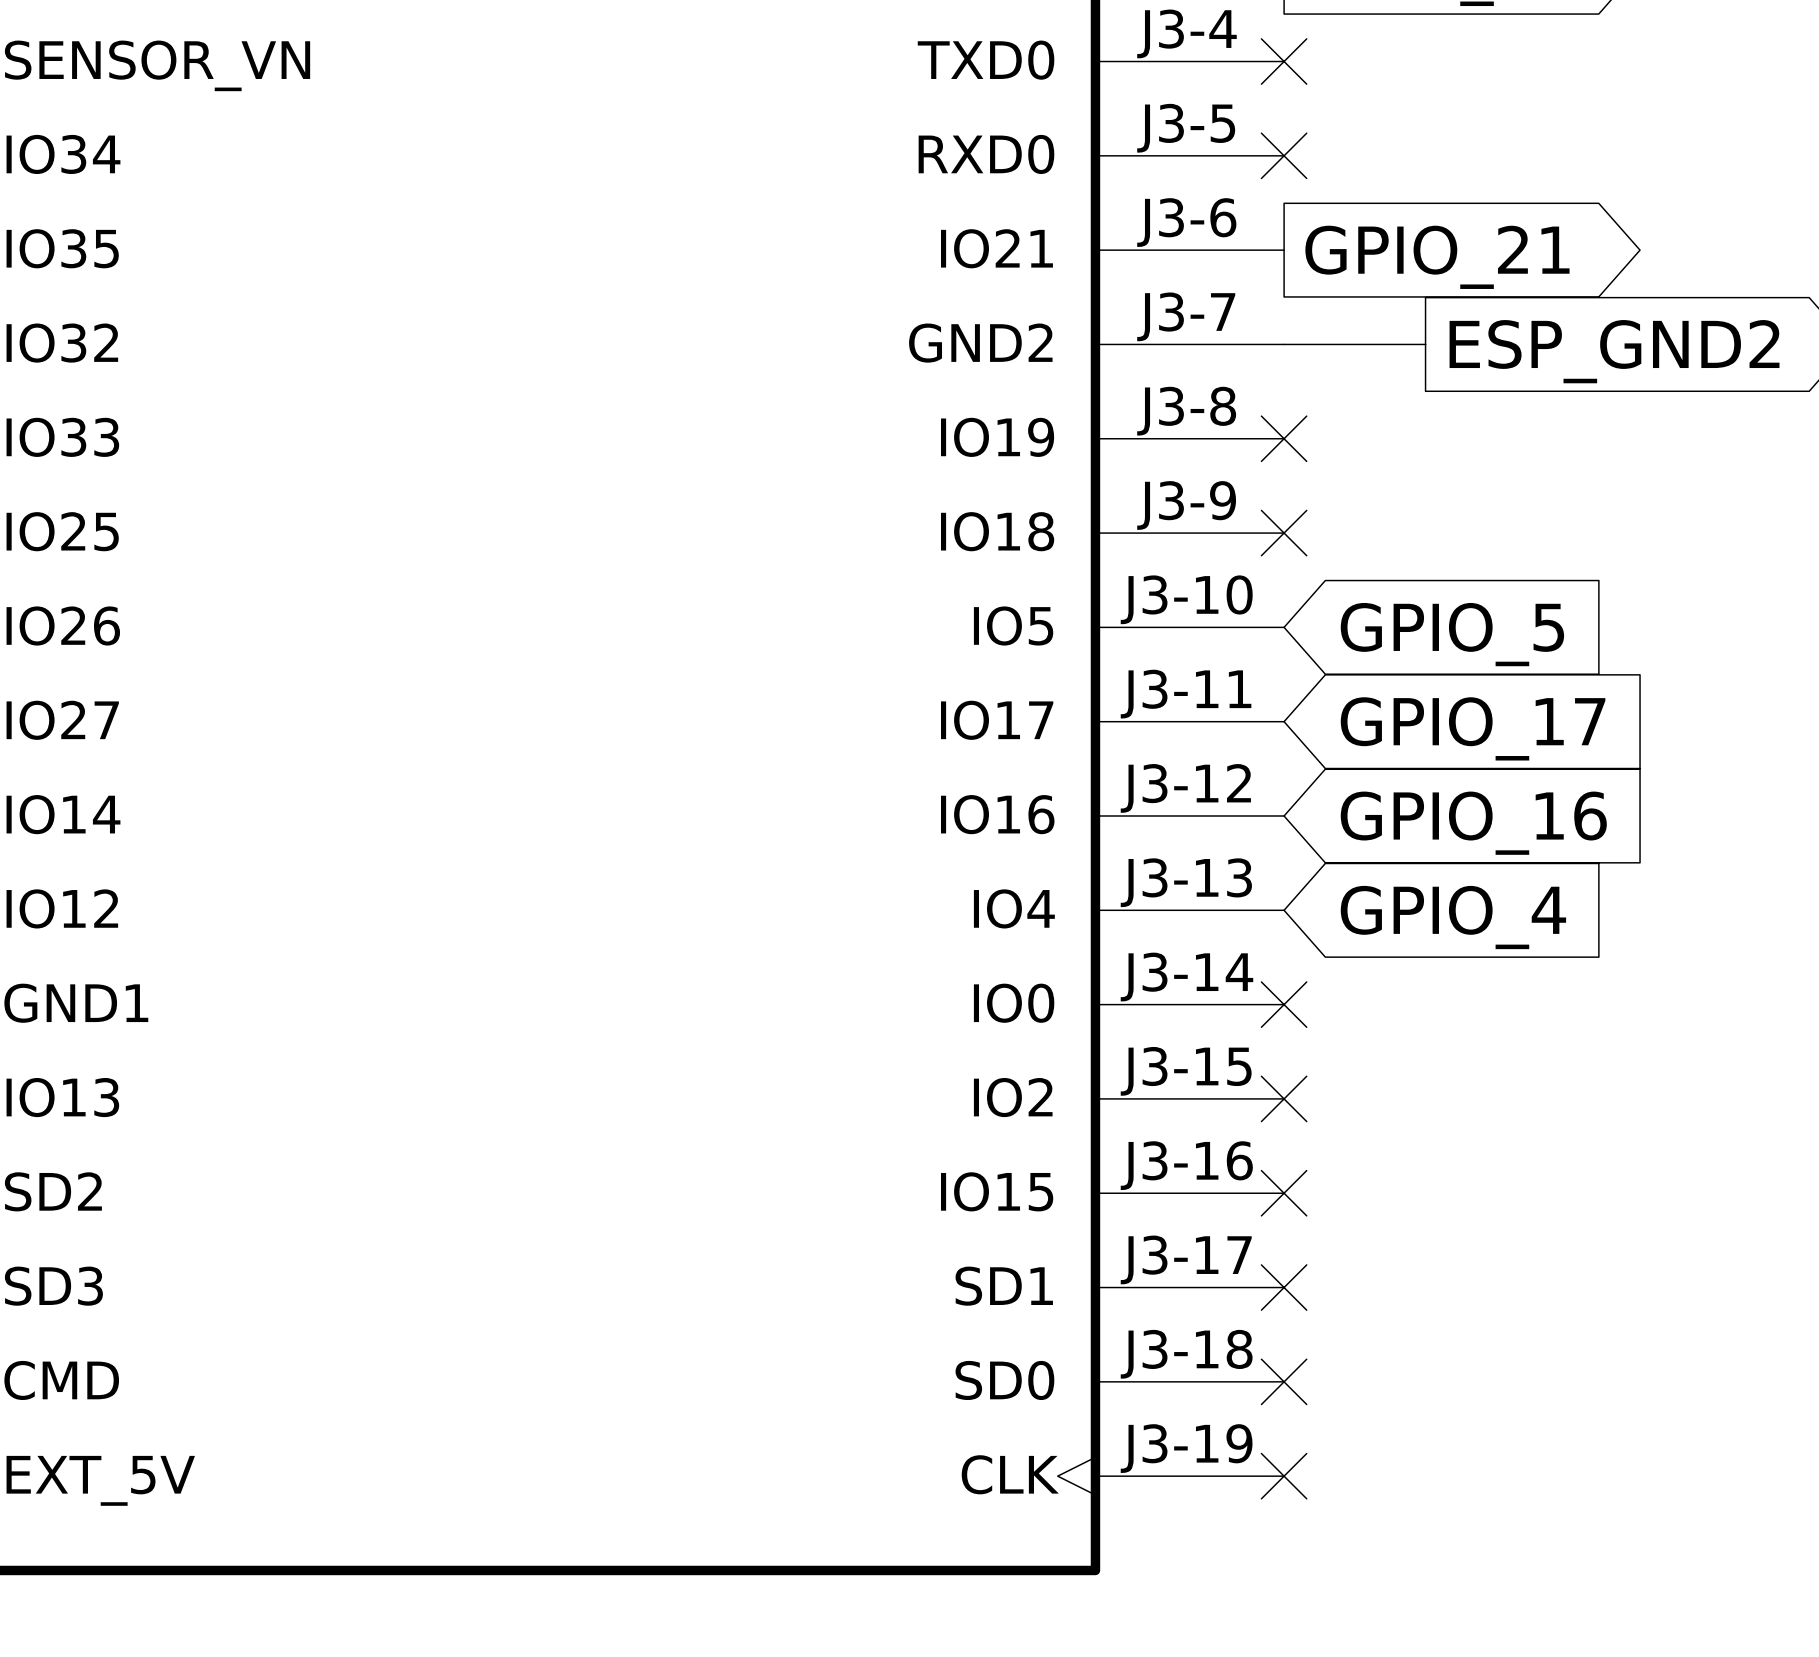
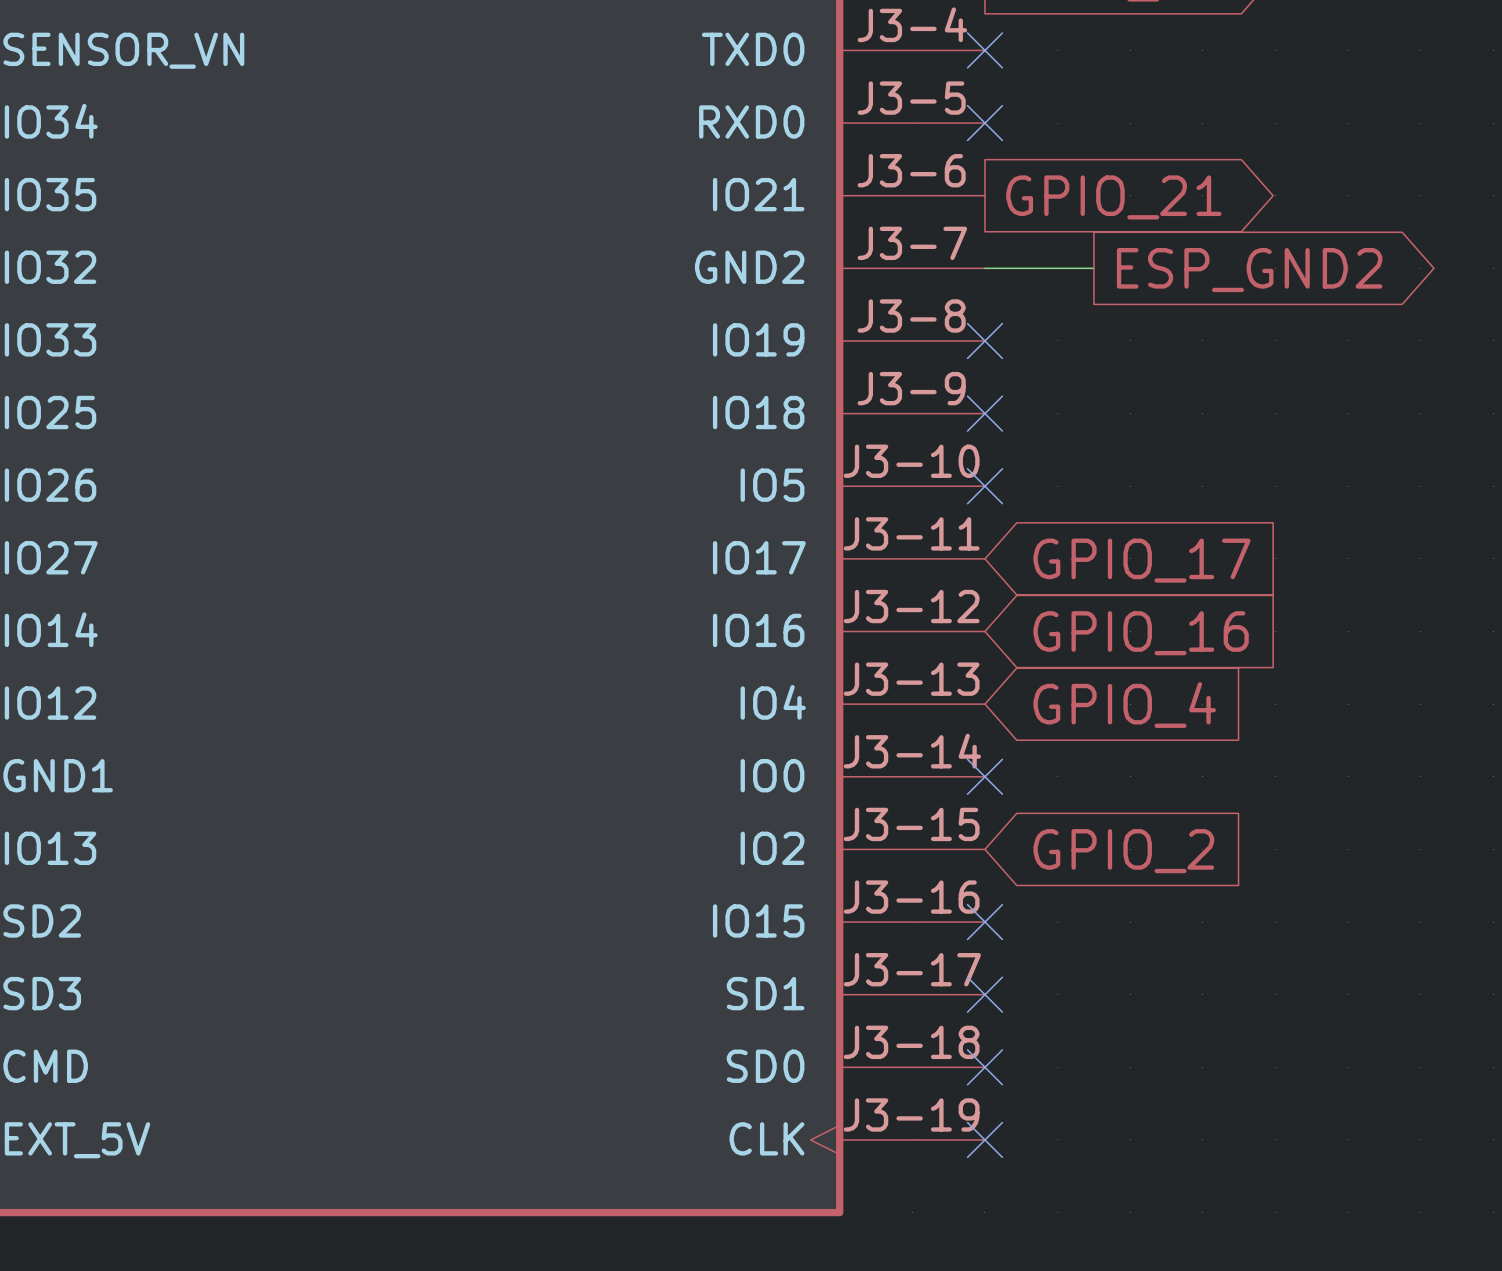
no-connect mark: none -> (984, 486)
global label: GPIO_5 (1452, 634) -> none
no-connect mark: (1284, 1098) -> none
global label: none -> GPIO_2 (1123, 851)

